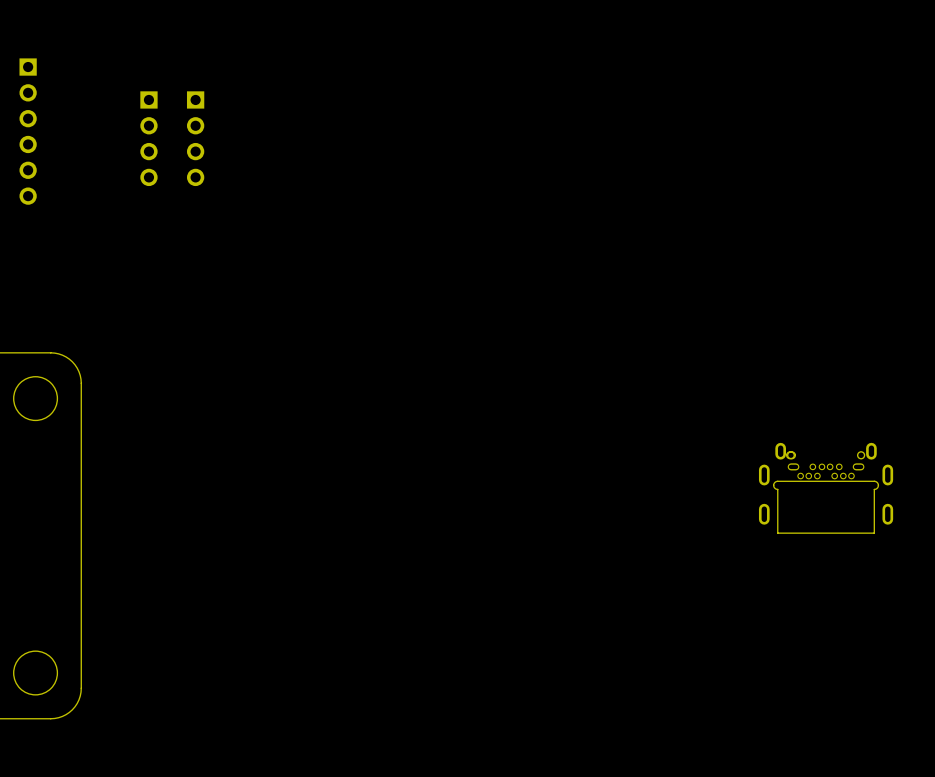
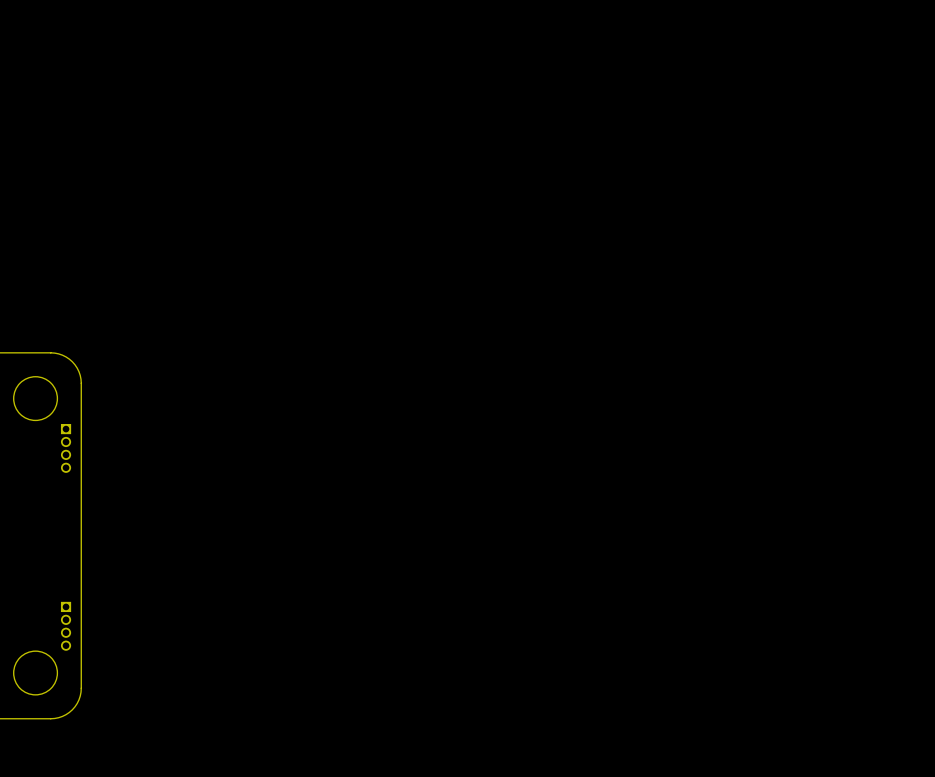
part: (28, 131) -> none
part: (148, 138) -> none
part: (195, 138) -> none
part: none -> (66, 448)
part: (826, 488) -> none
part: none -> (66, 626)

